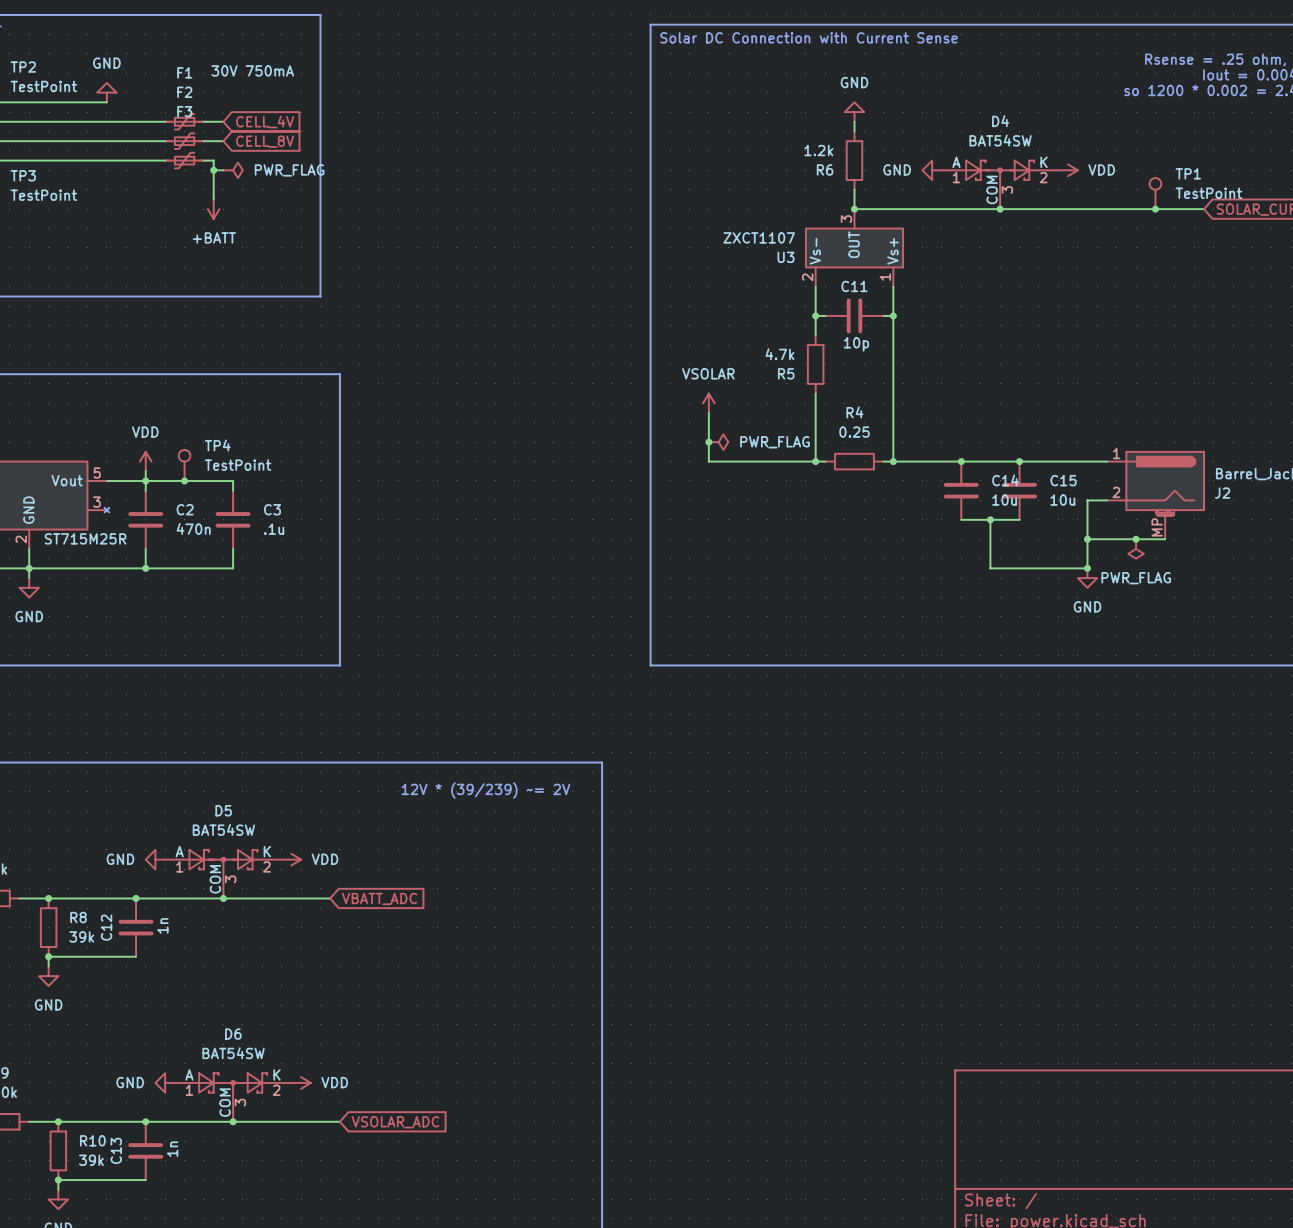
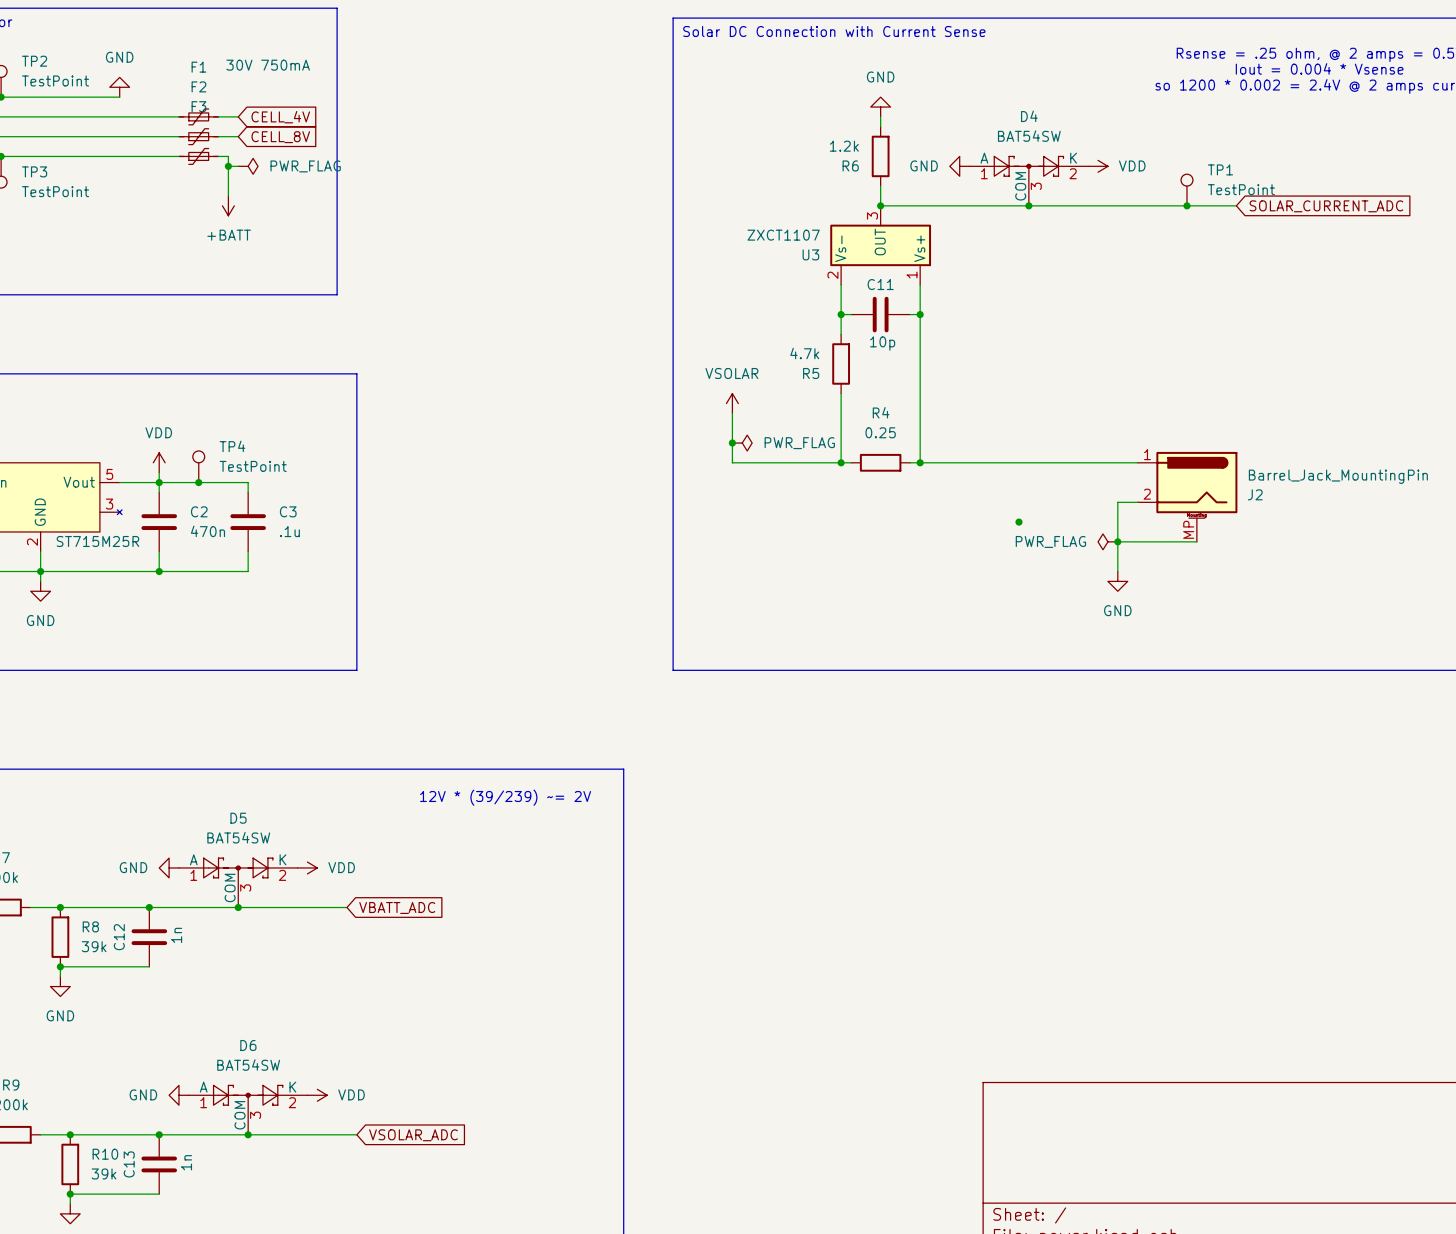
junction: (961, 461) -> none
junction: (1019, 461) -> none
C14: 10u (961, 490) -> none
C15: 10u (1019, 490) -> none
wire: (961, 519) (1019, 519) -> none
wire: (990, 519) (990, 568) (1087, 568) -> none
junction: (1136, 539) -> none
power symbol rotation: 0° (1136, 548) -> 90° clockwise (1107, 541)
power symbol position: PWR_FLAG (1136, 548) -> PWR_FLAG (1107, 541)
junction: (1087, 568) -> none
power symbol text position: PWR_FLAG (1136, 578) -> PWR_FLAG (1050, 541)

